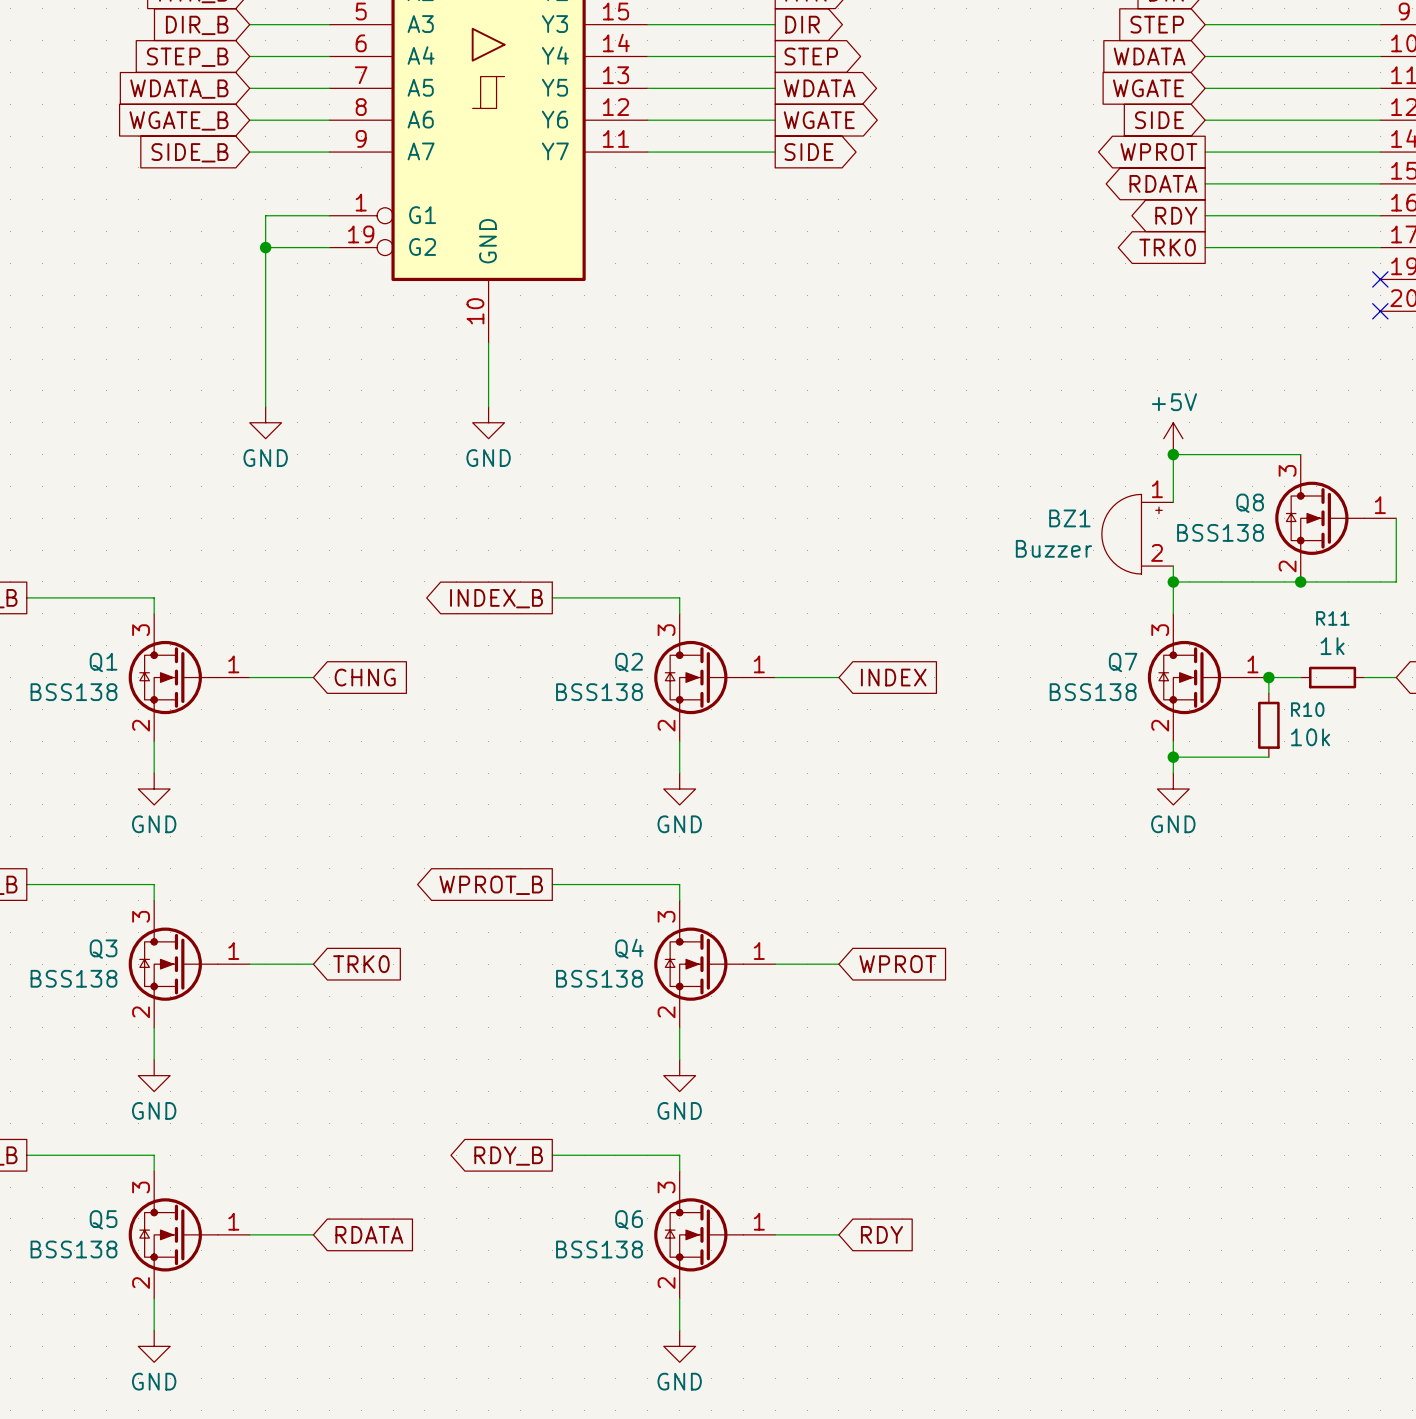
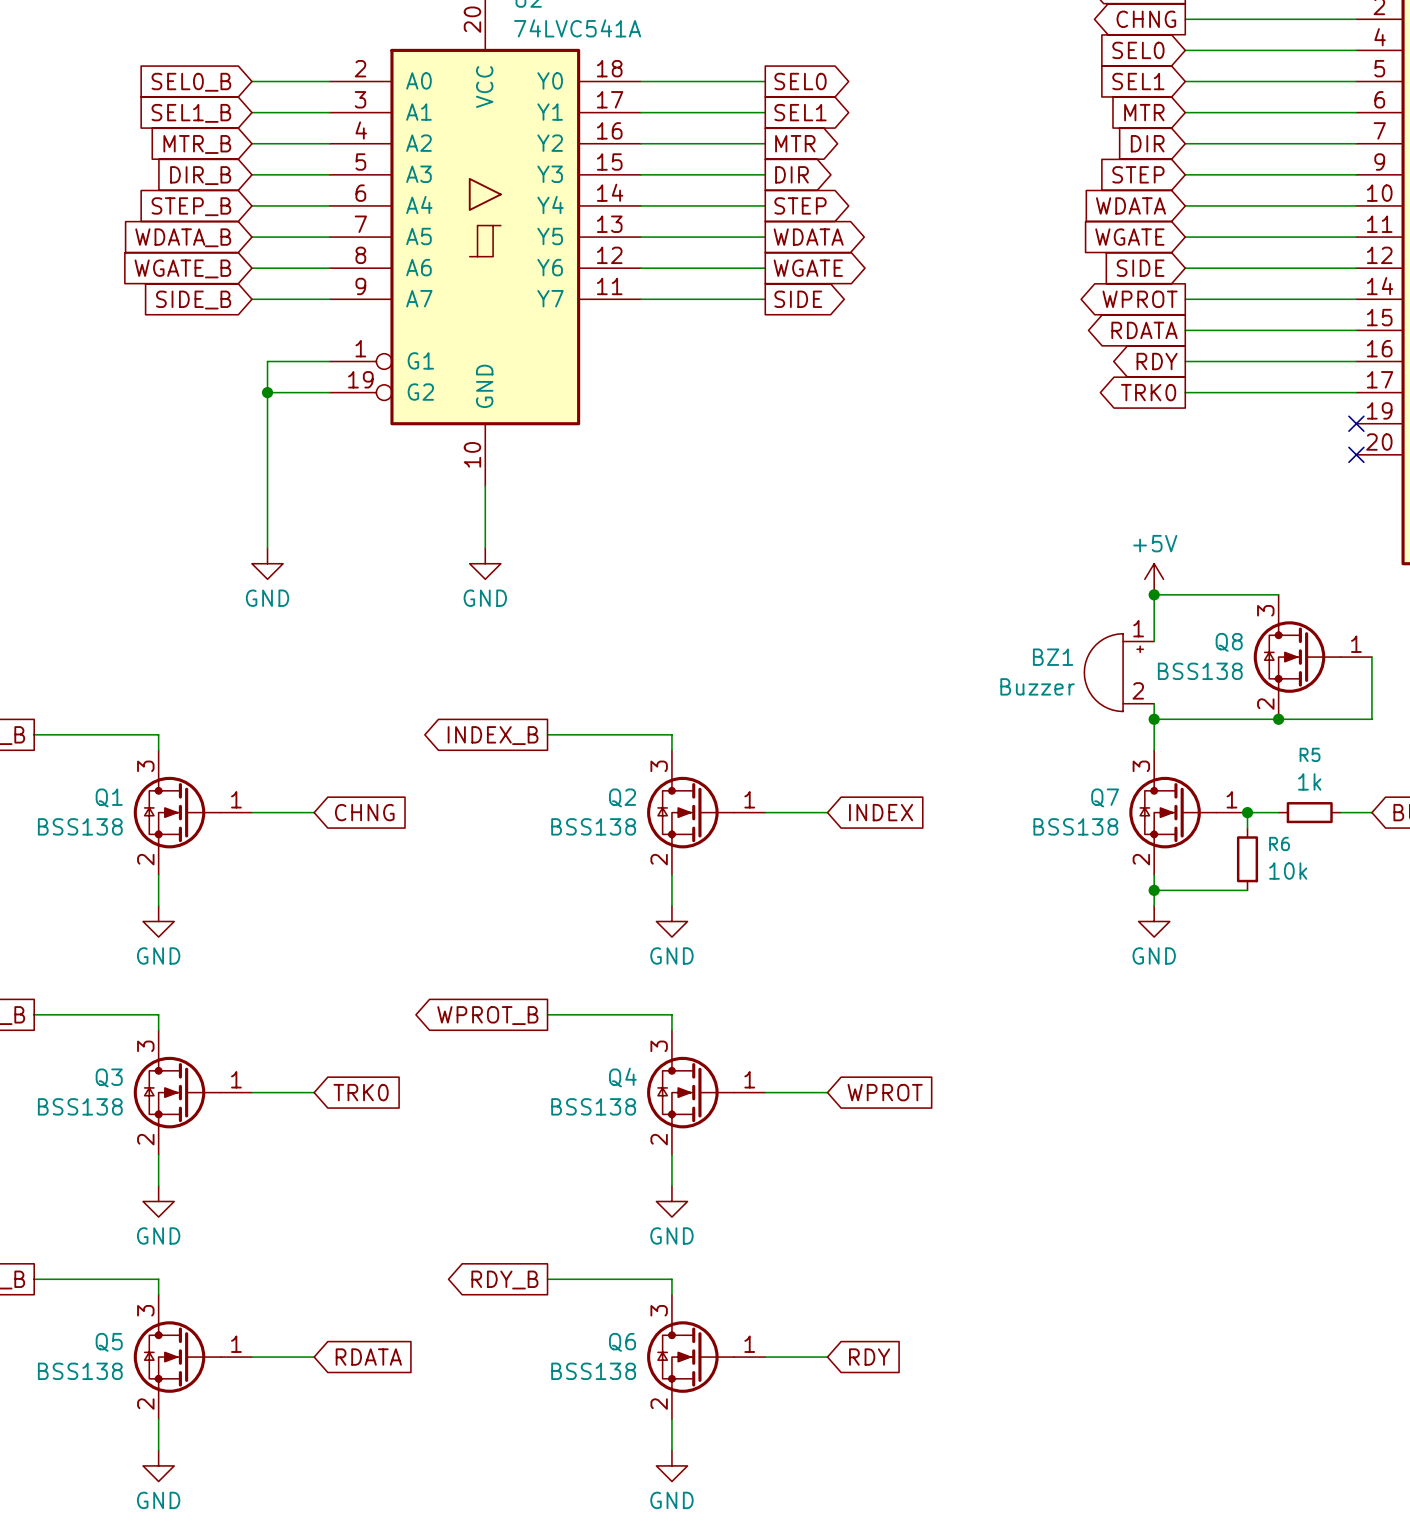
R11 name: R11 (1332, 618) -> R5 (1310, 754)
R10 name: R10 (1307, 709) -> R6 (1279, 843)

